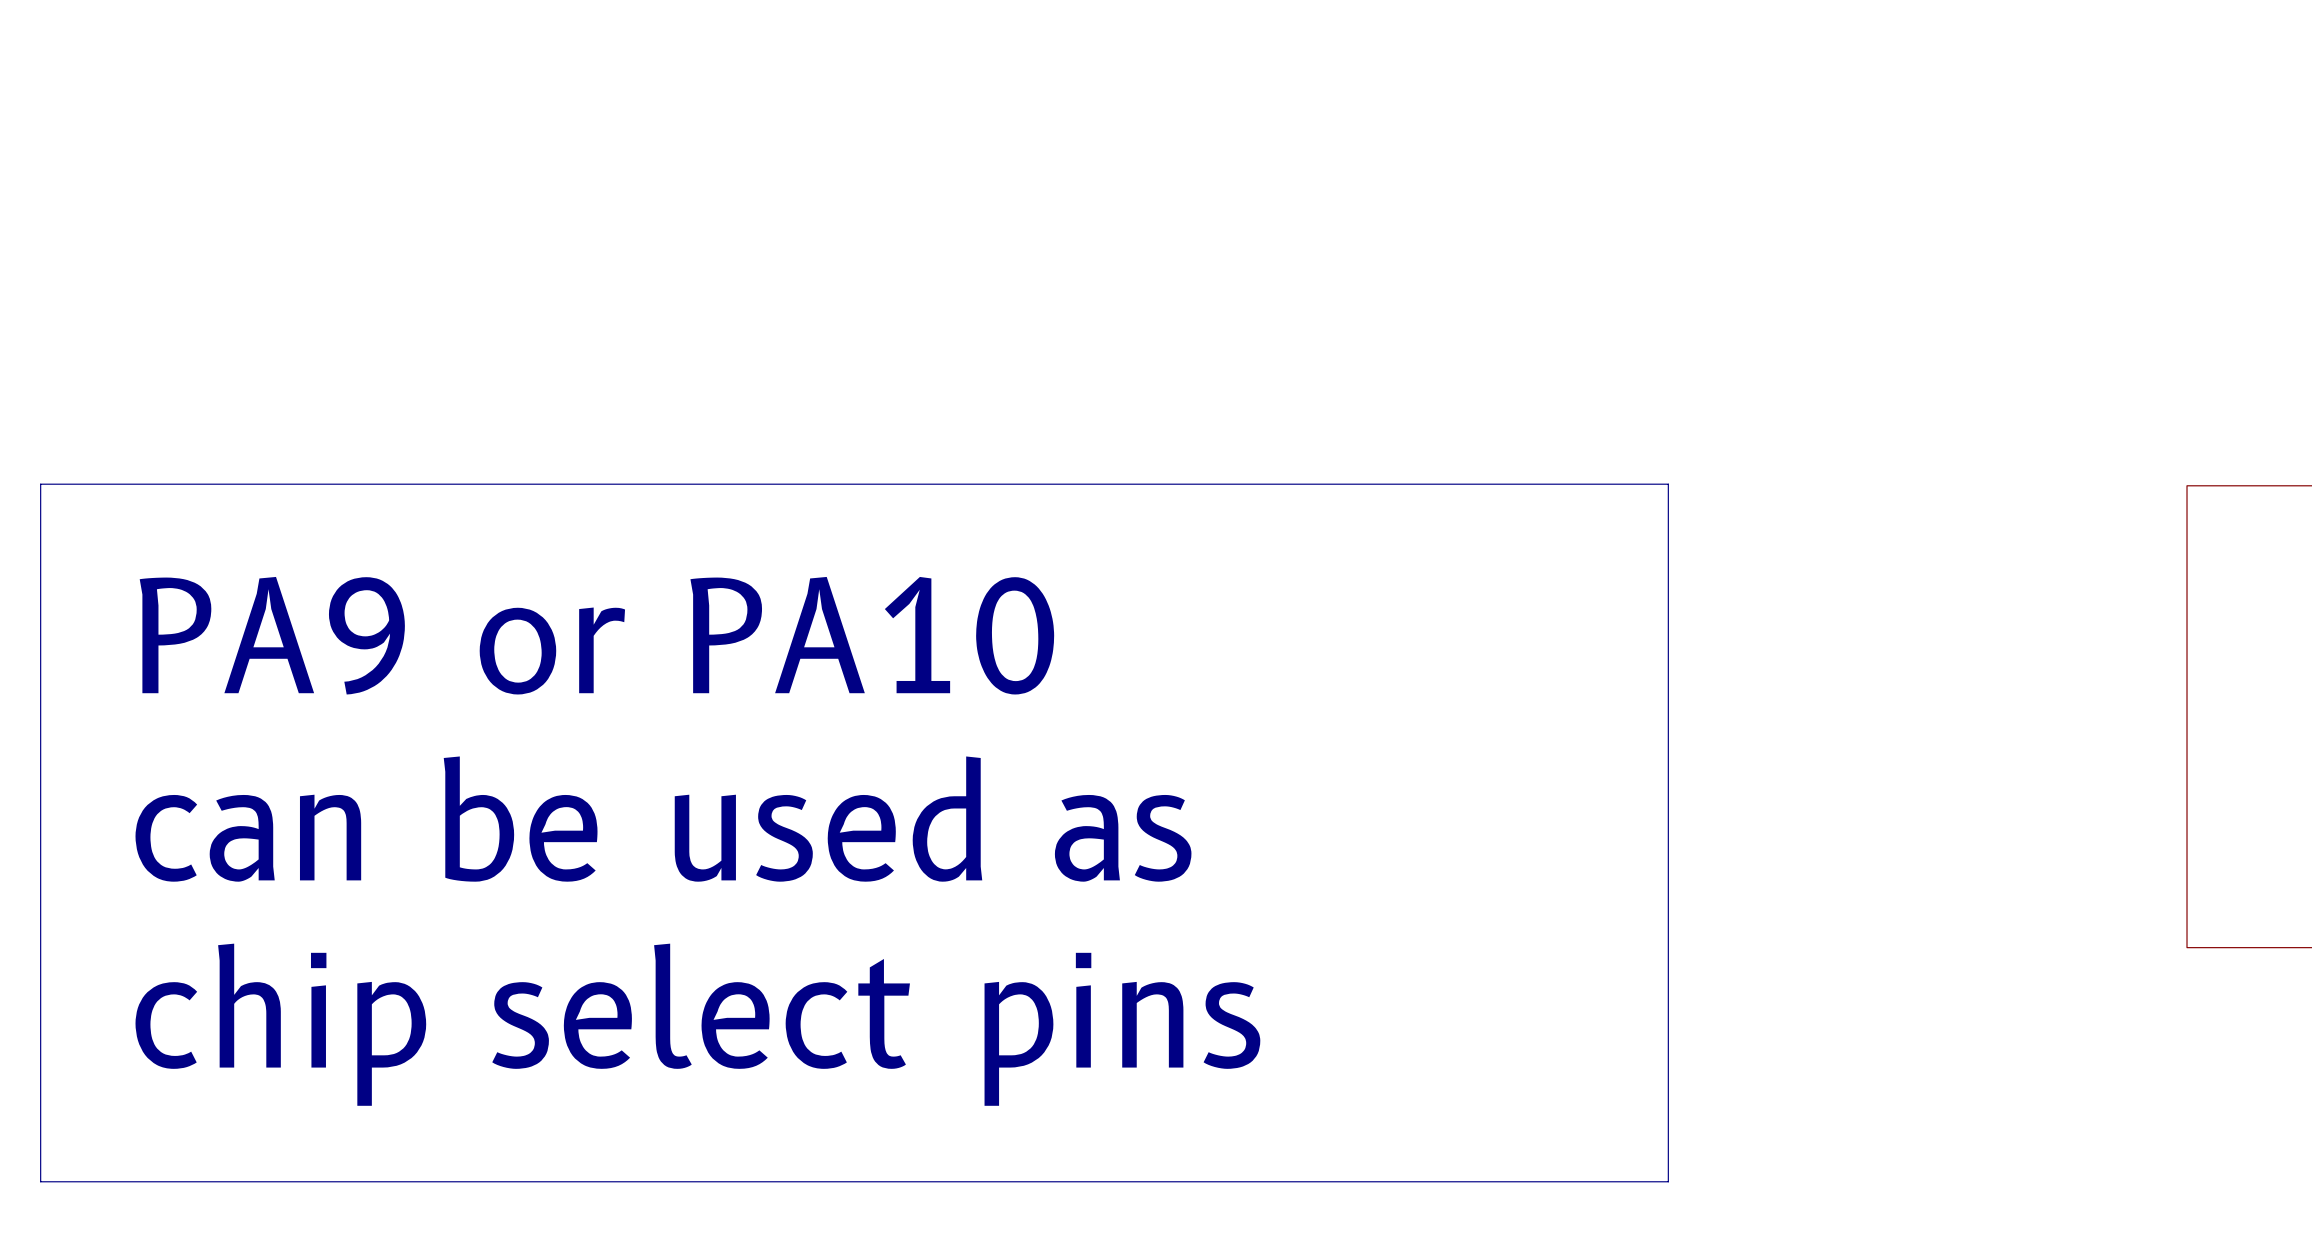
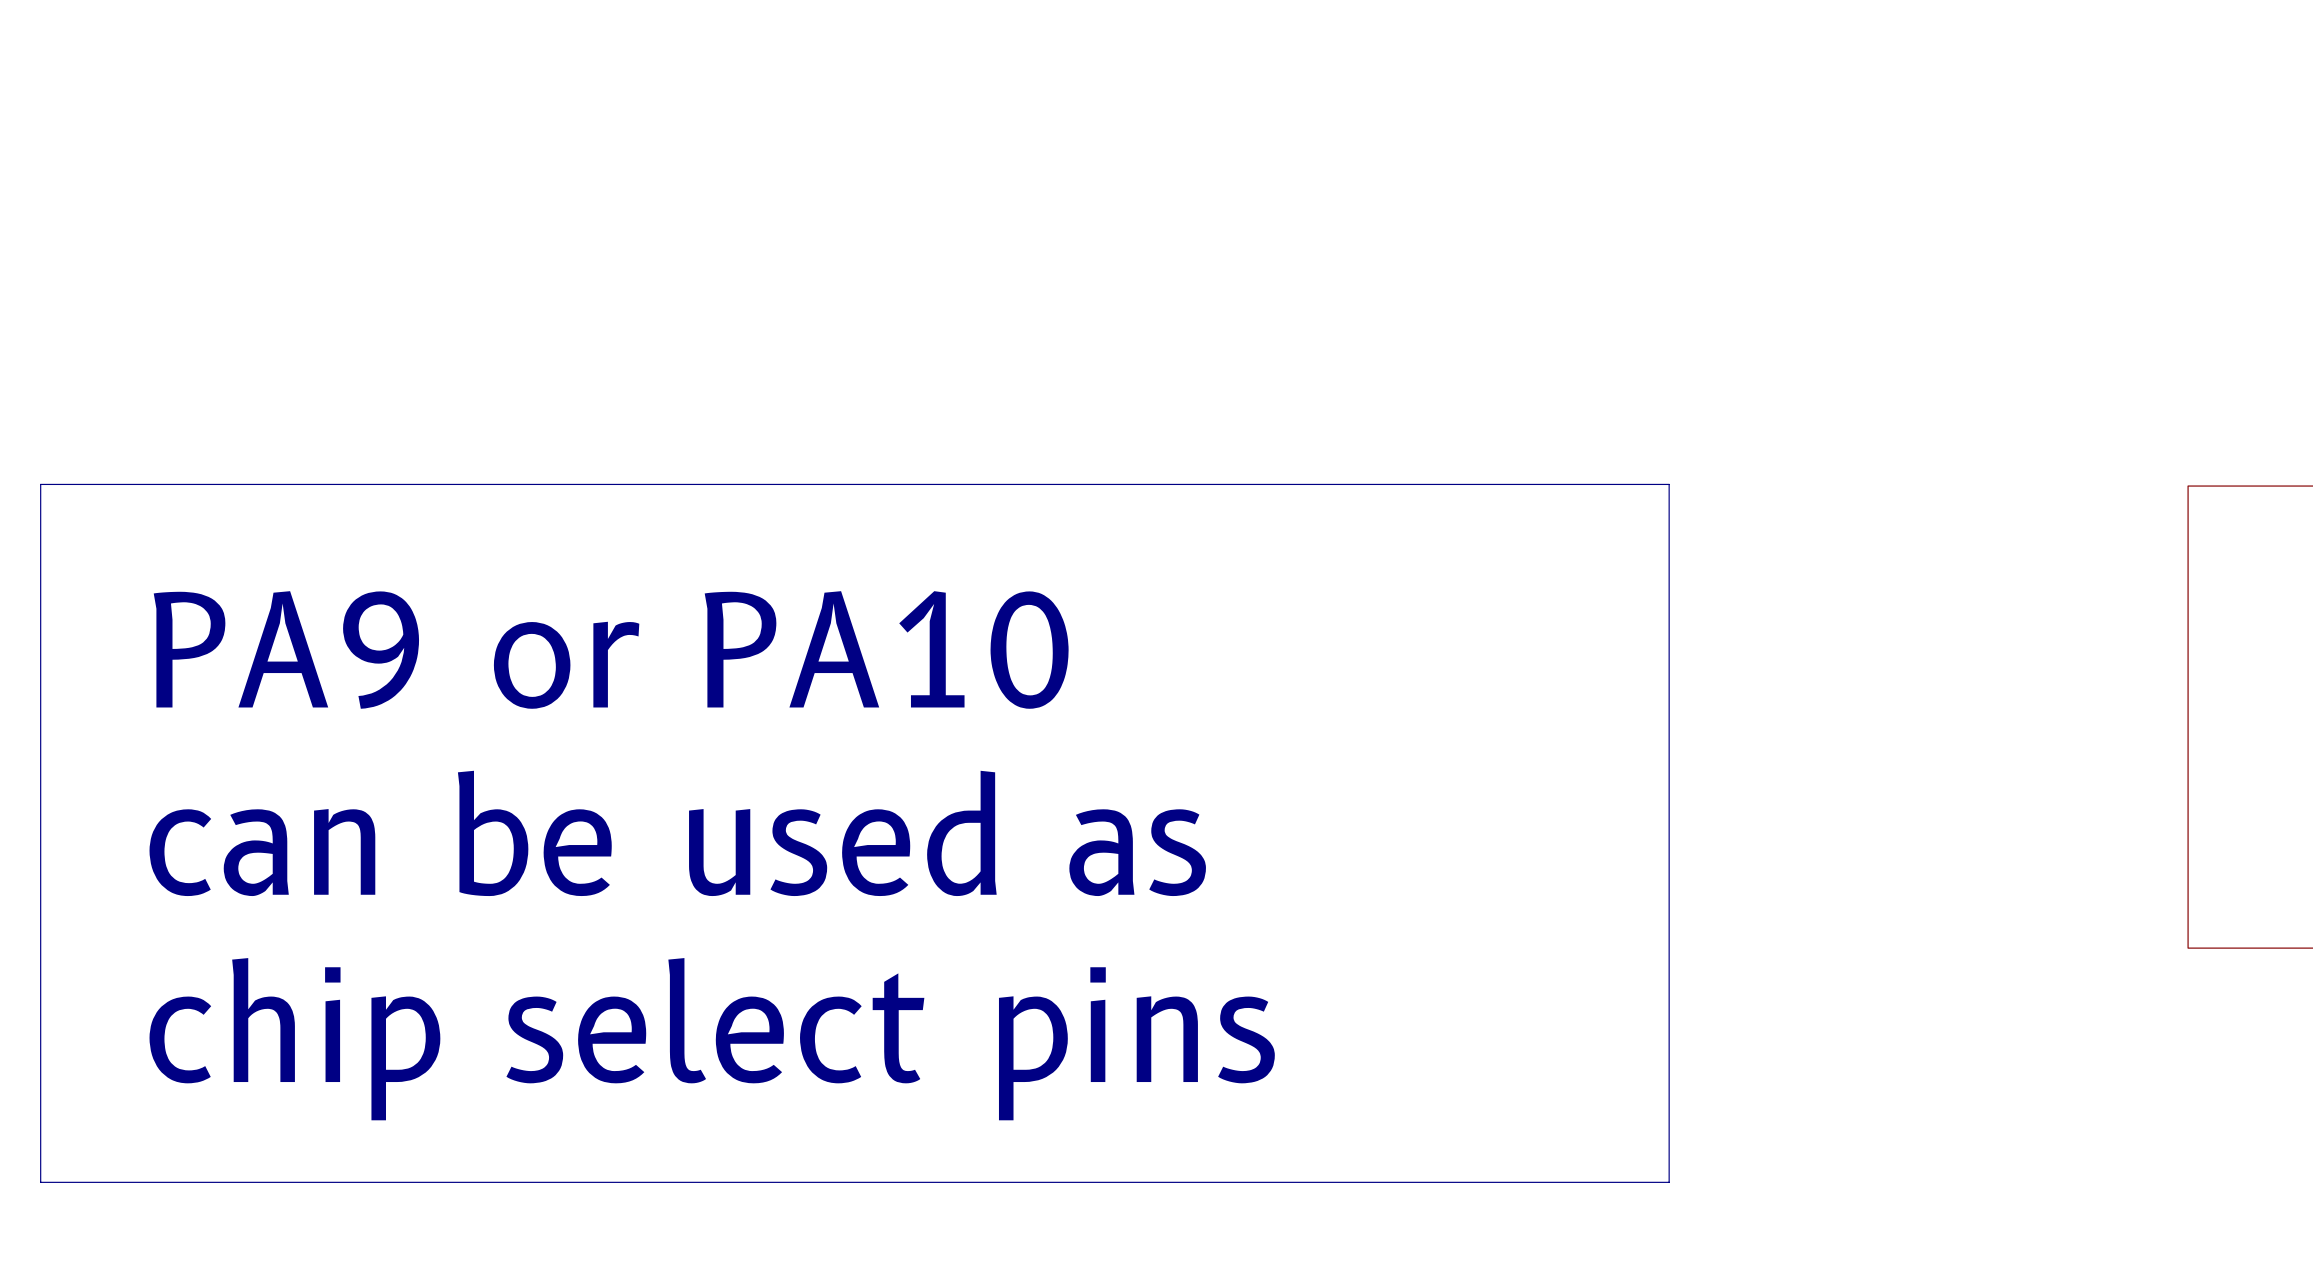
text position: PA9 or PA10 (596, 635) -> PA9 or PA10 (611, 649)
text position: can be used as (663, 819) -> can be used as (677, 833)
text position: chip select pins (697, 1024) -> chip select pins (712, 1039)

